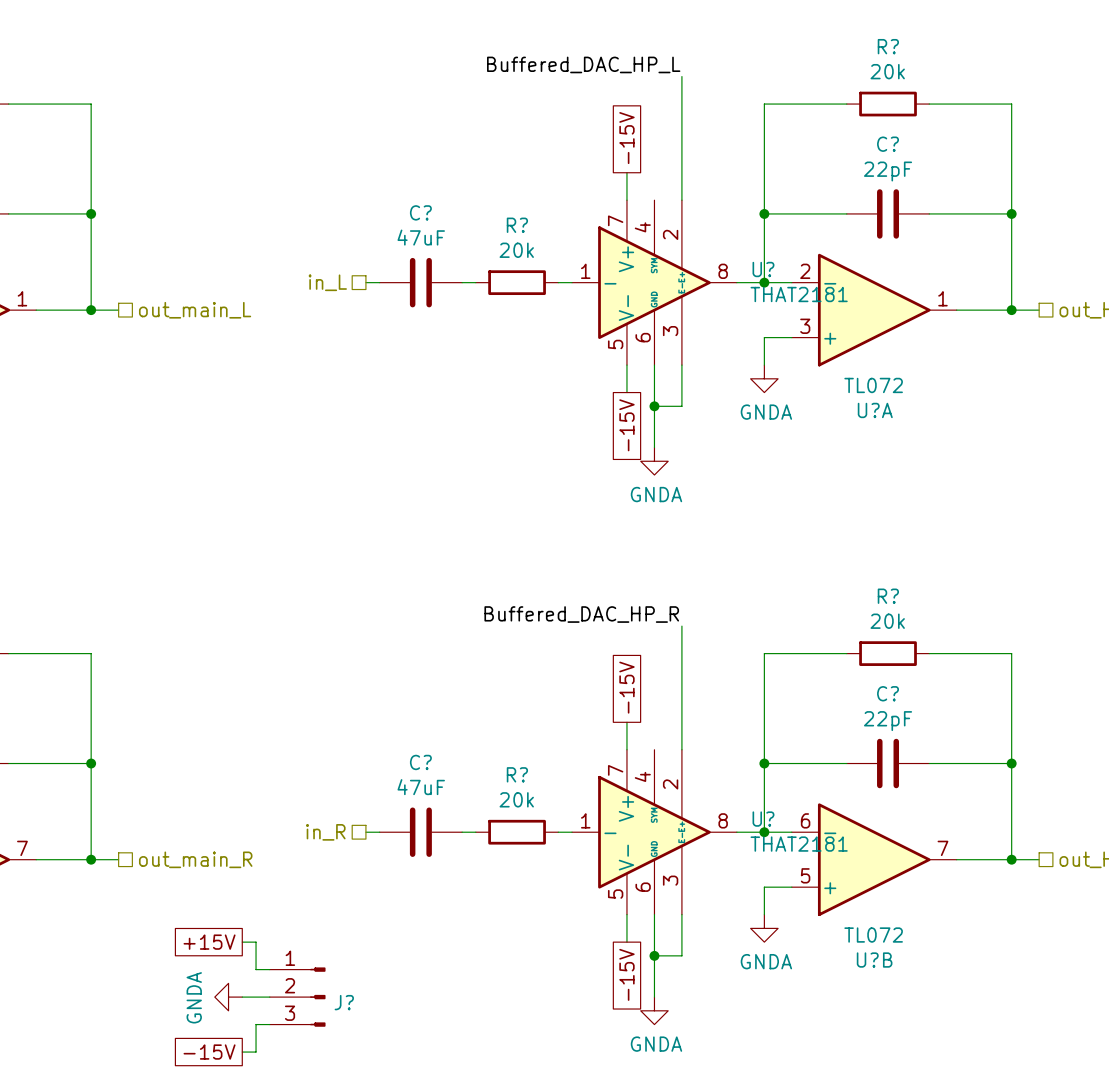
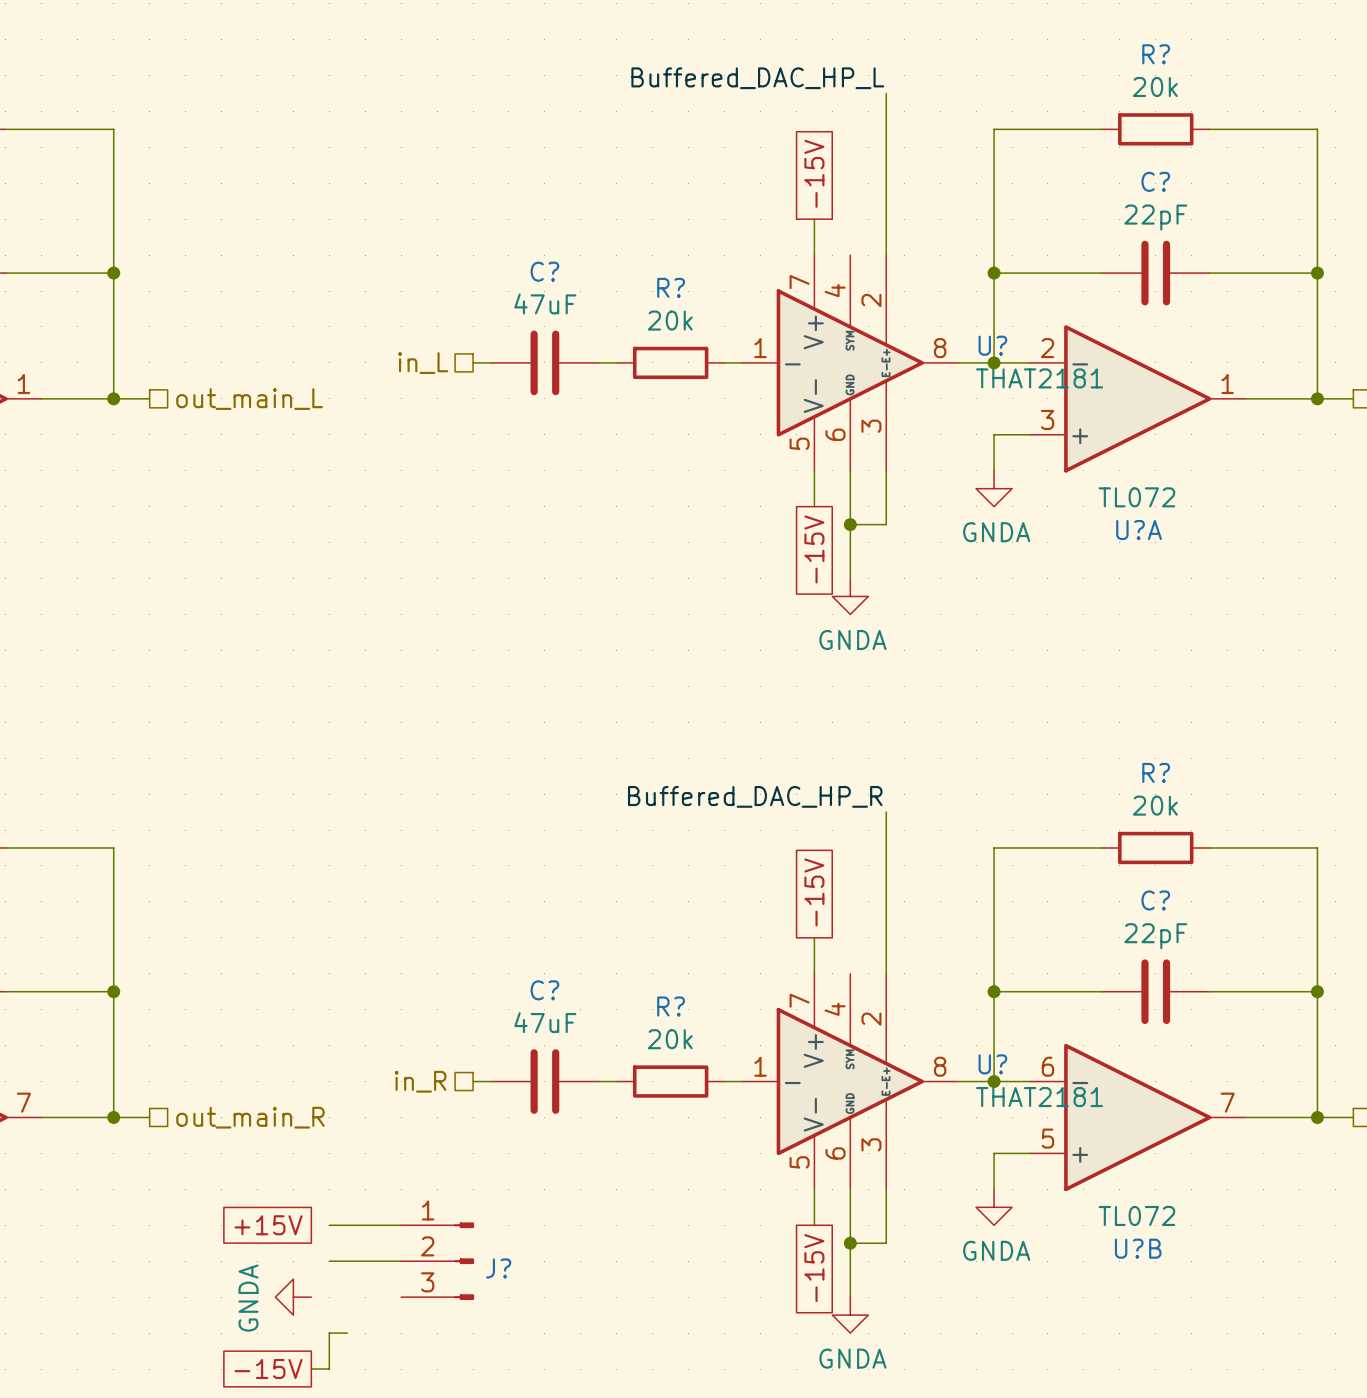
wire: (242, 942) (256, 942) (256, 969) -> none
wire: none -> (329, 1225) (401, 1225)
wire: (242, 997) (269, 997) -> none
J? position: (297, 997) -> (437, 1261)

